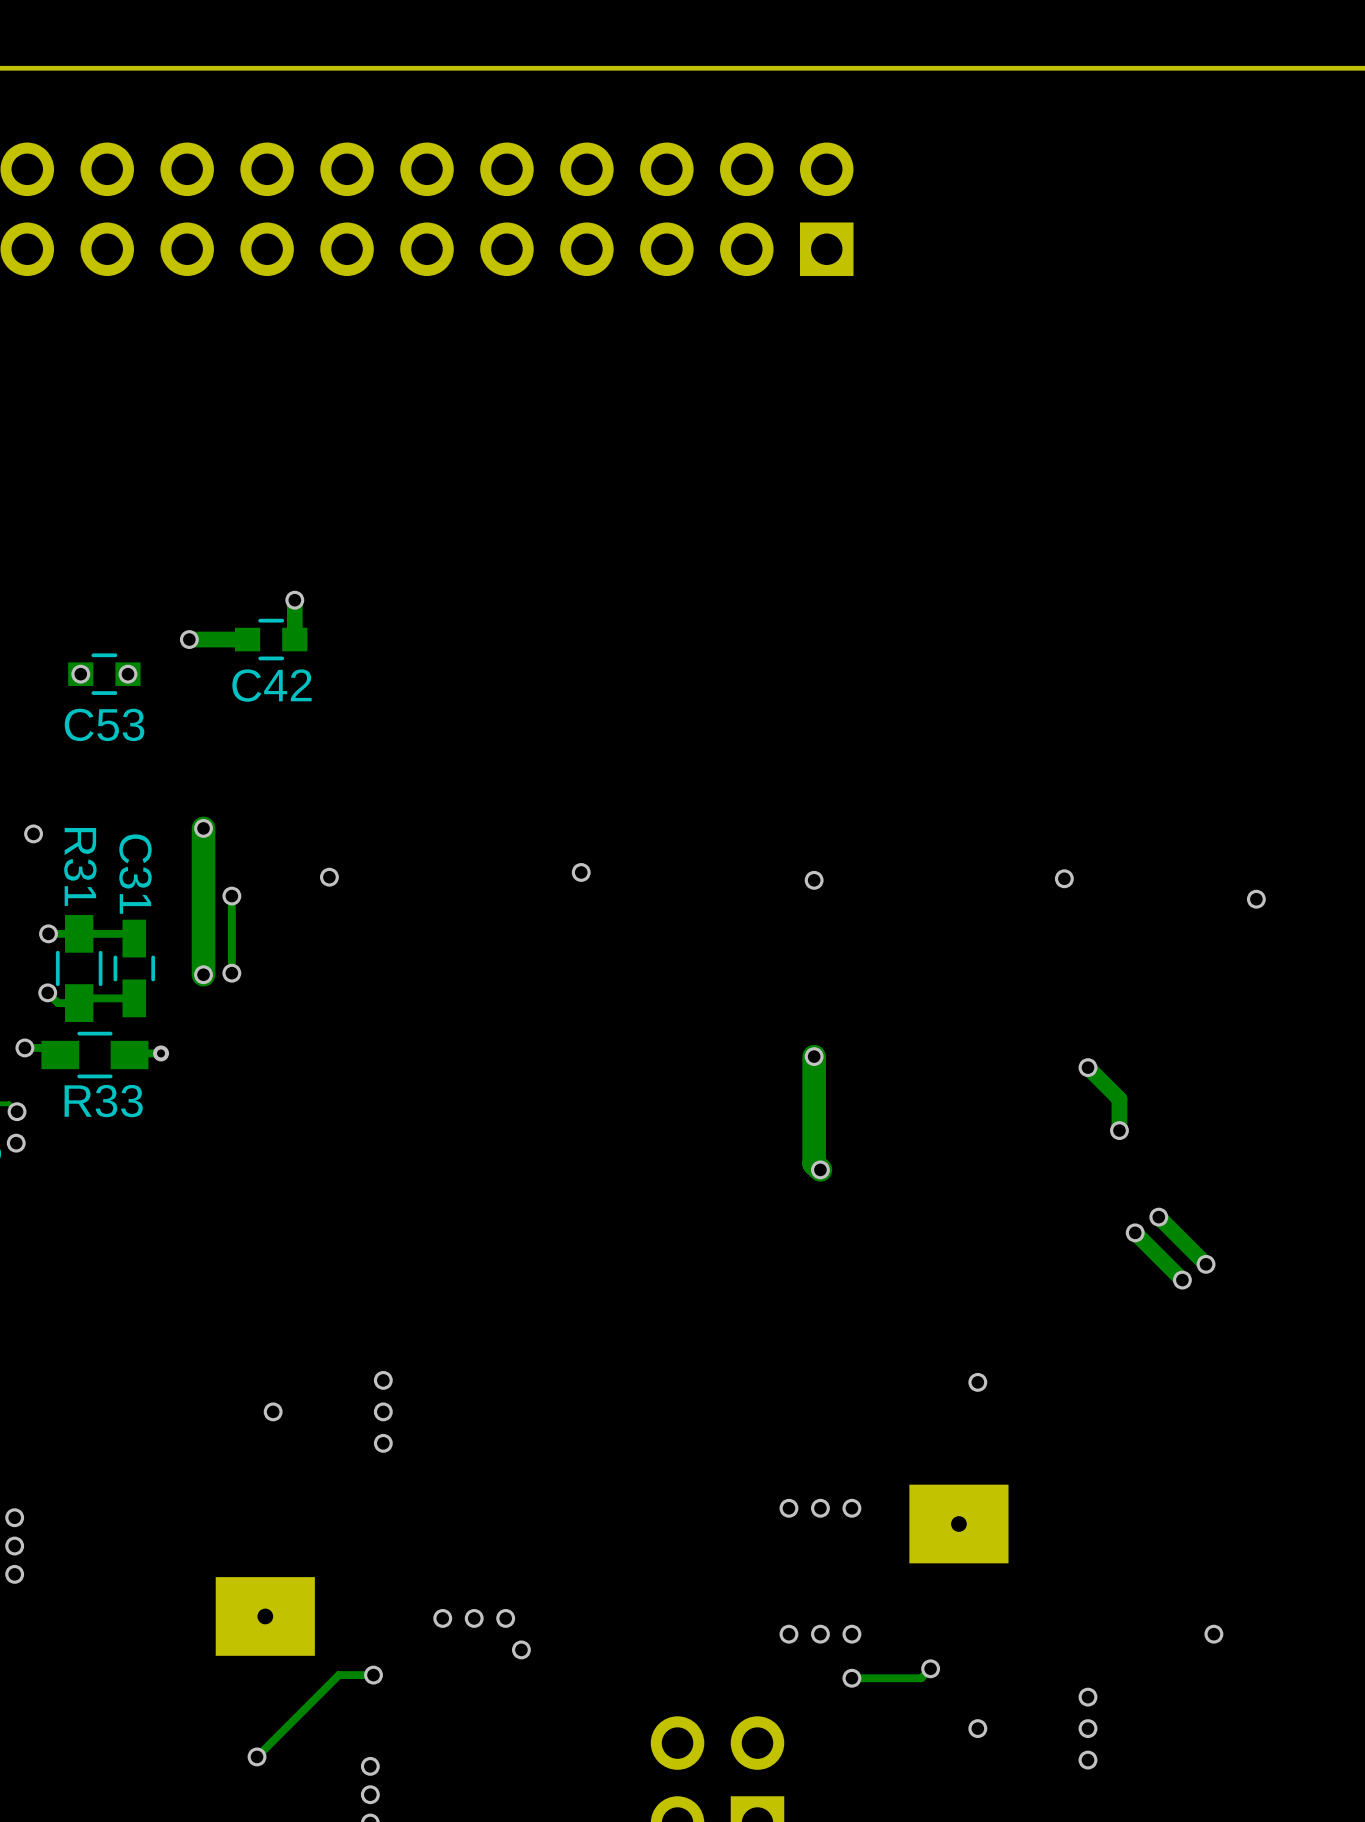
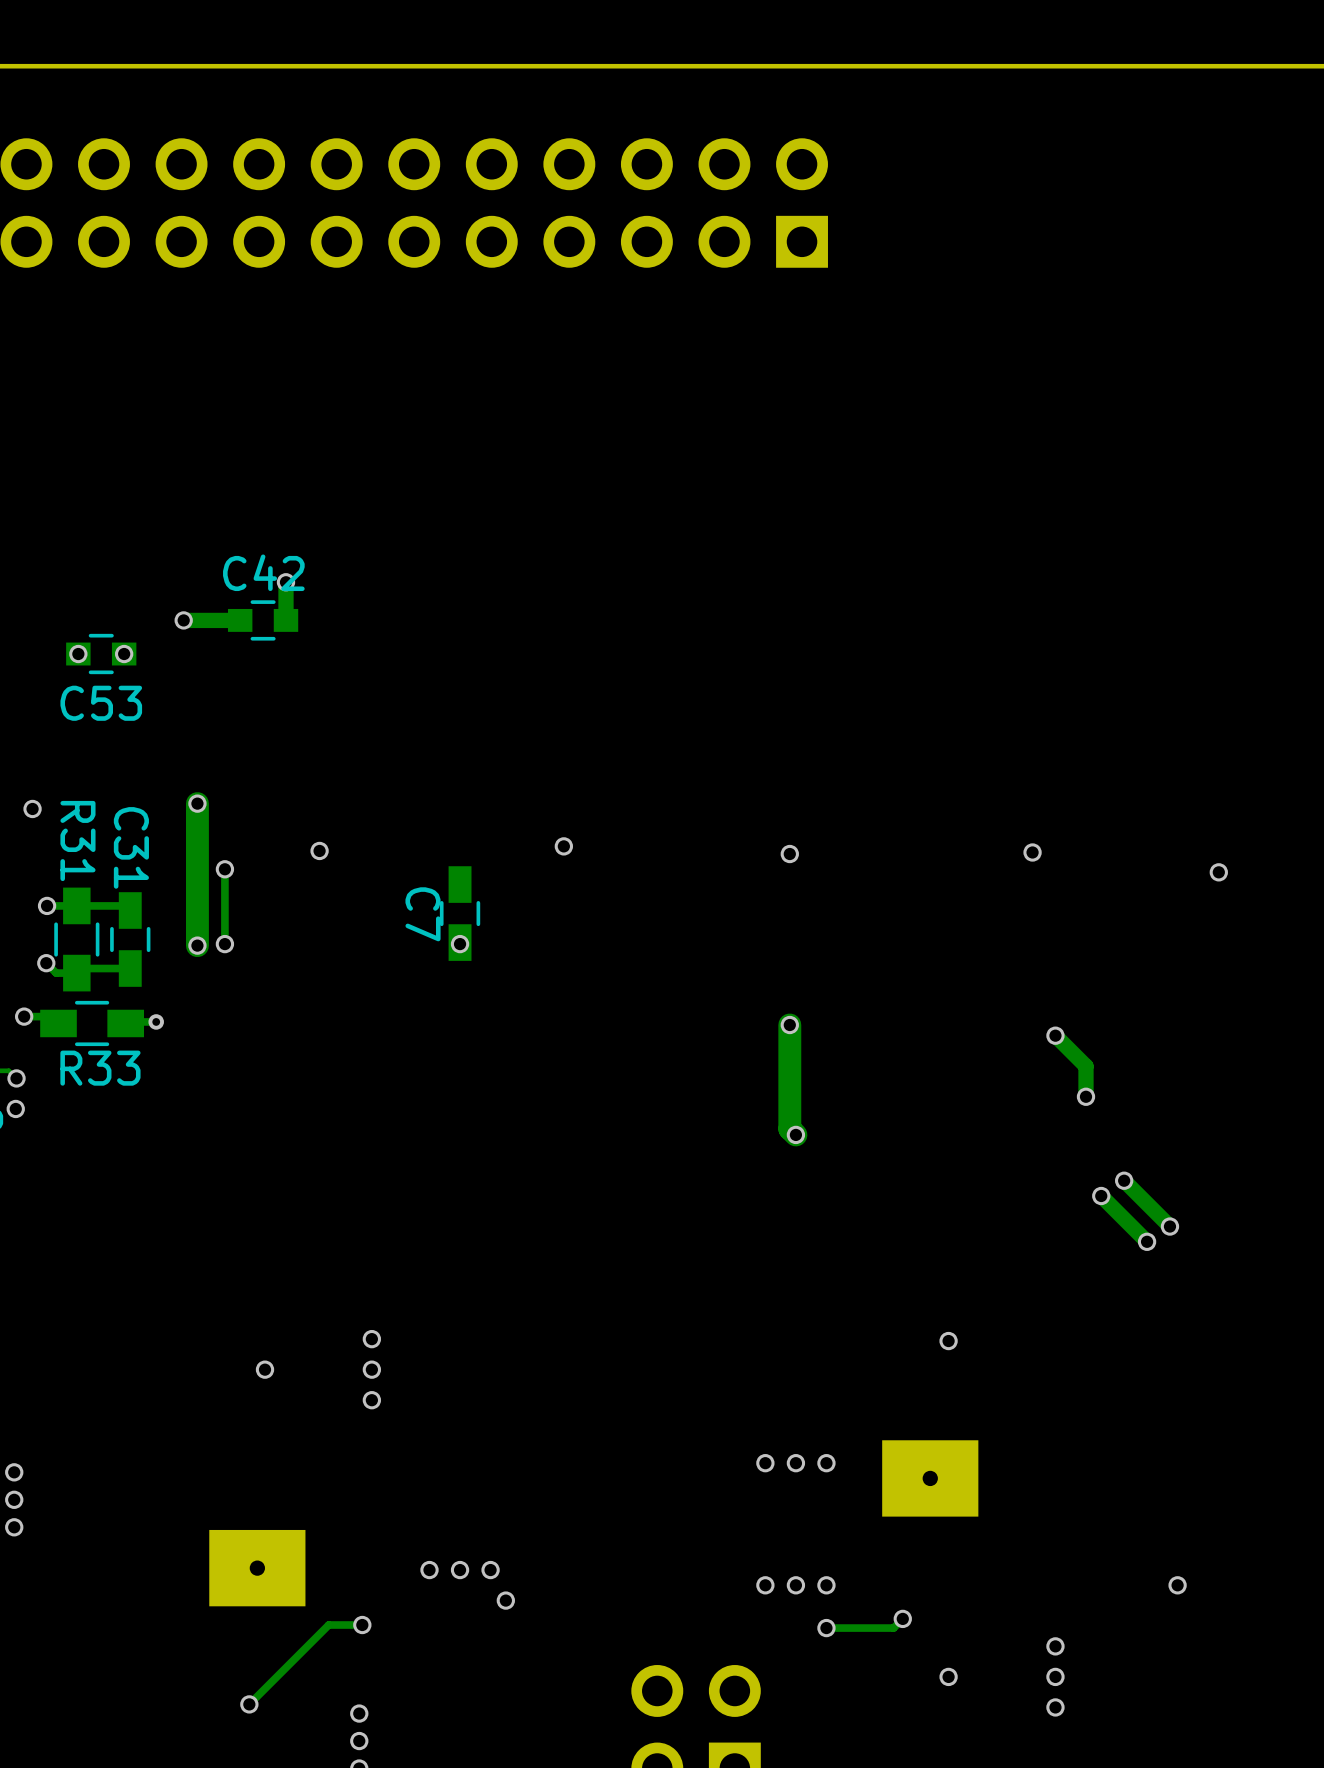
C42 name position: C42 (272, 685) -> C42 (263, 572)
C7: none -> (460, 913)
via: none -> (460, 944)

